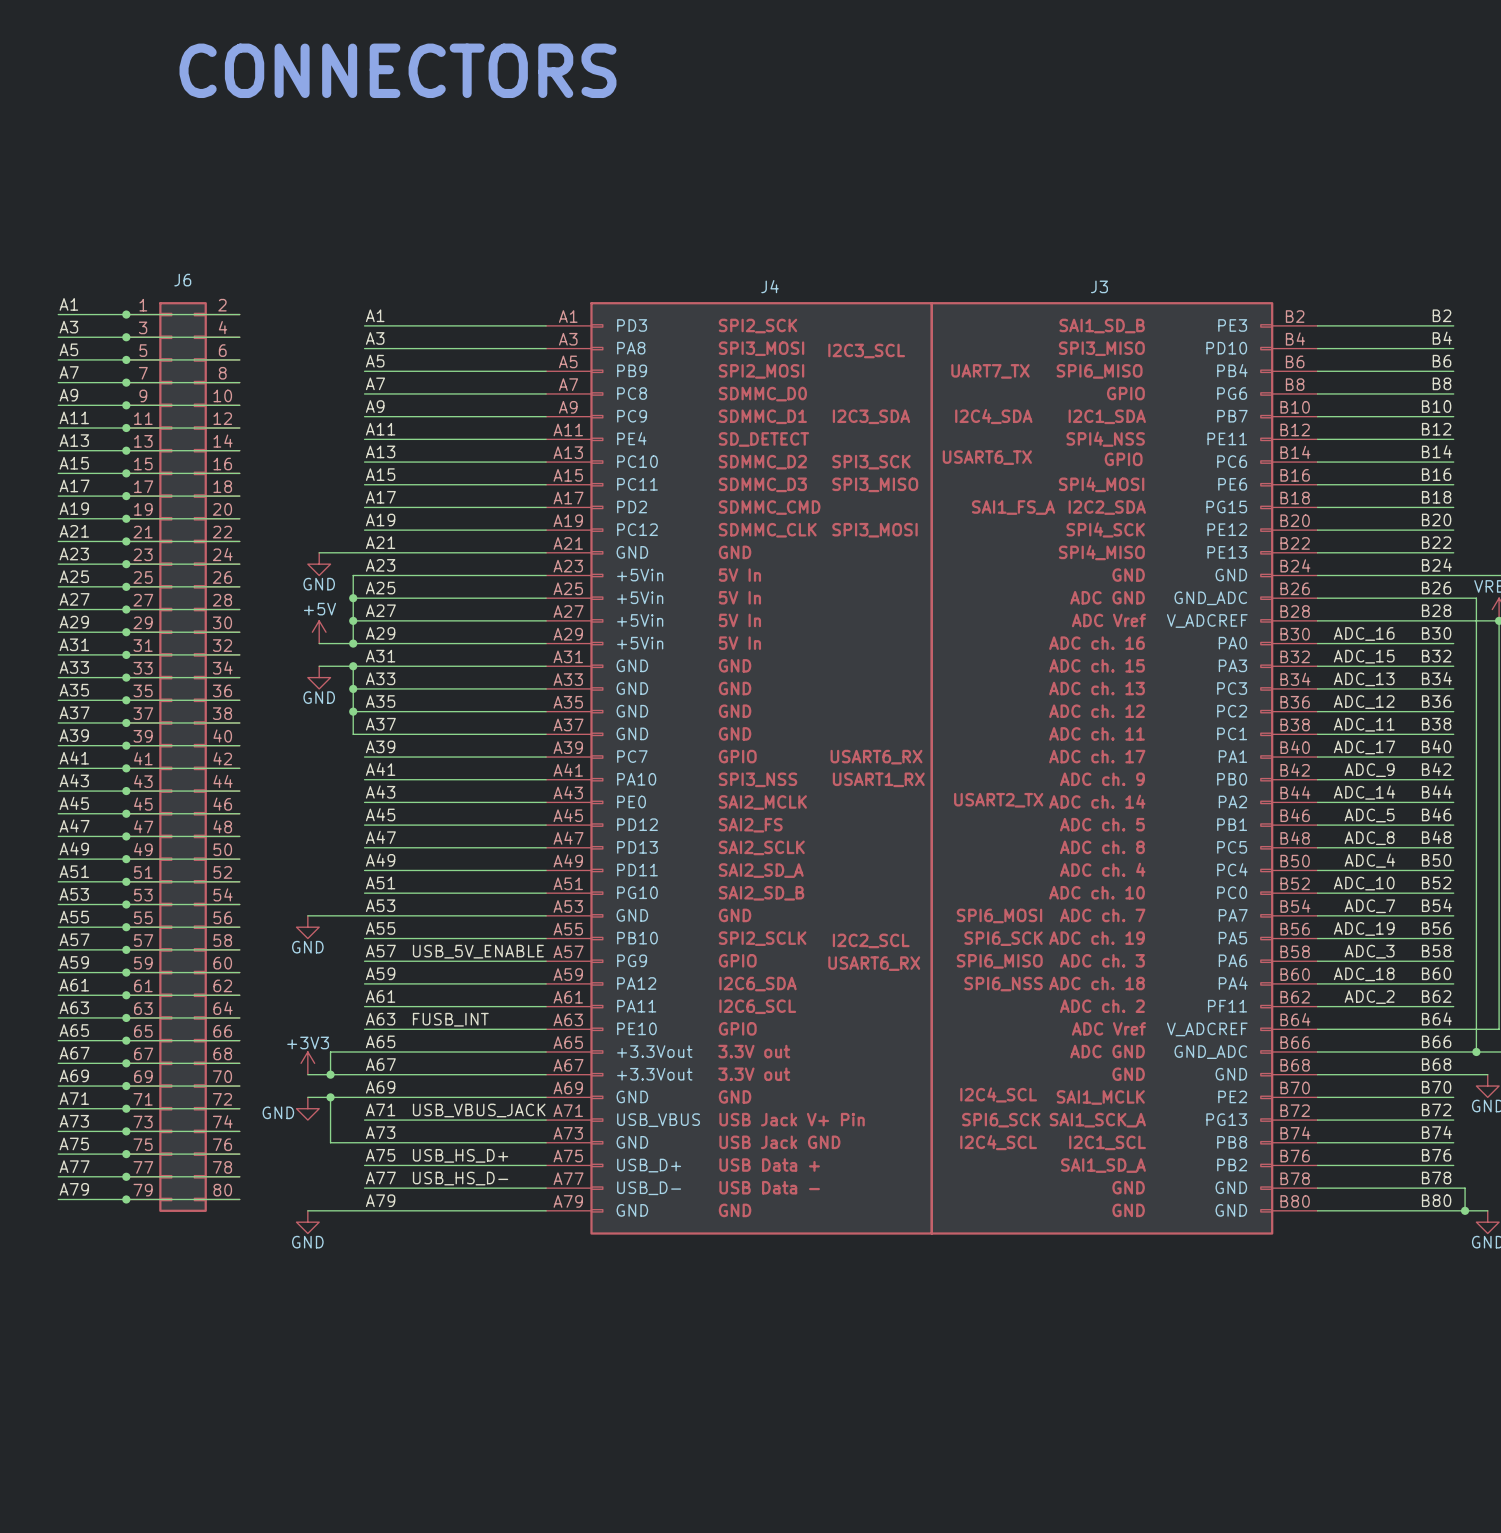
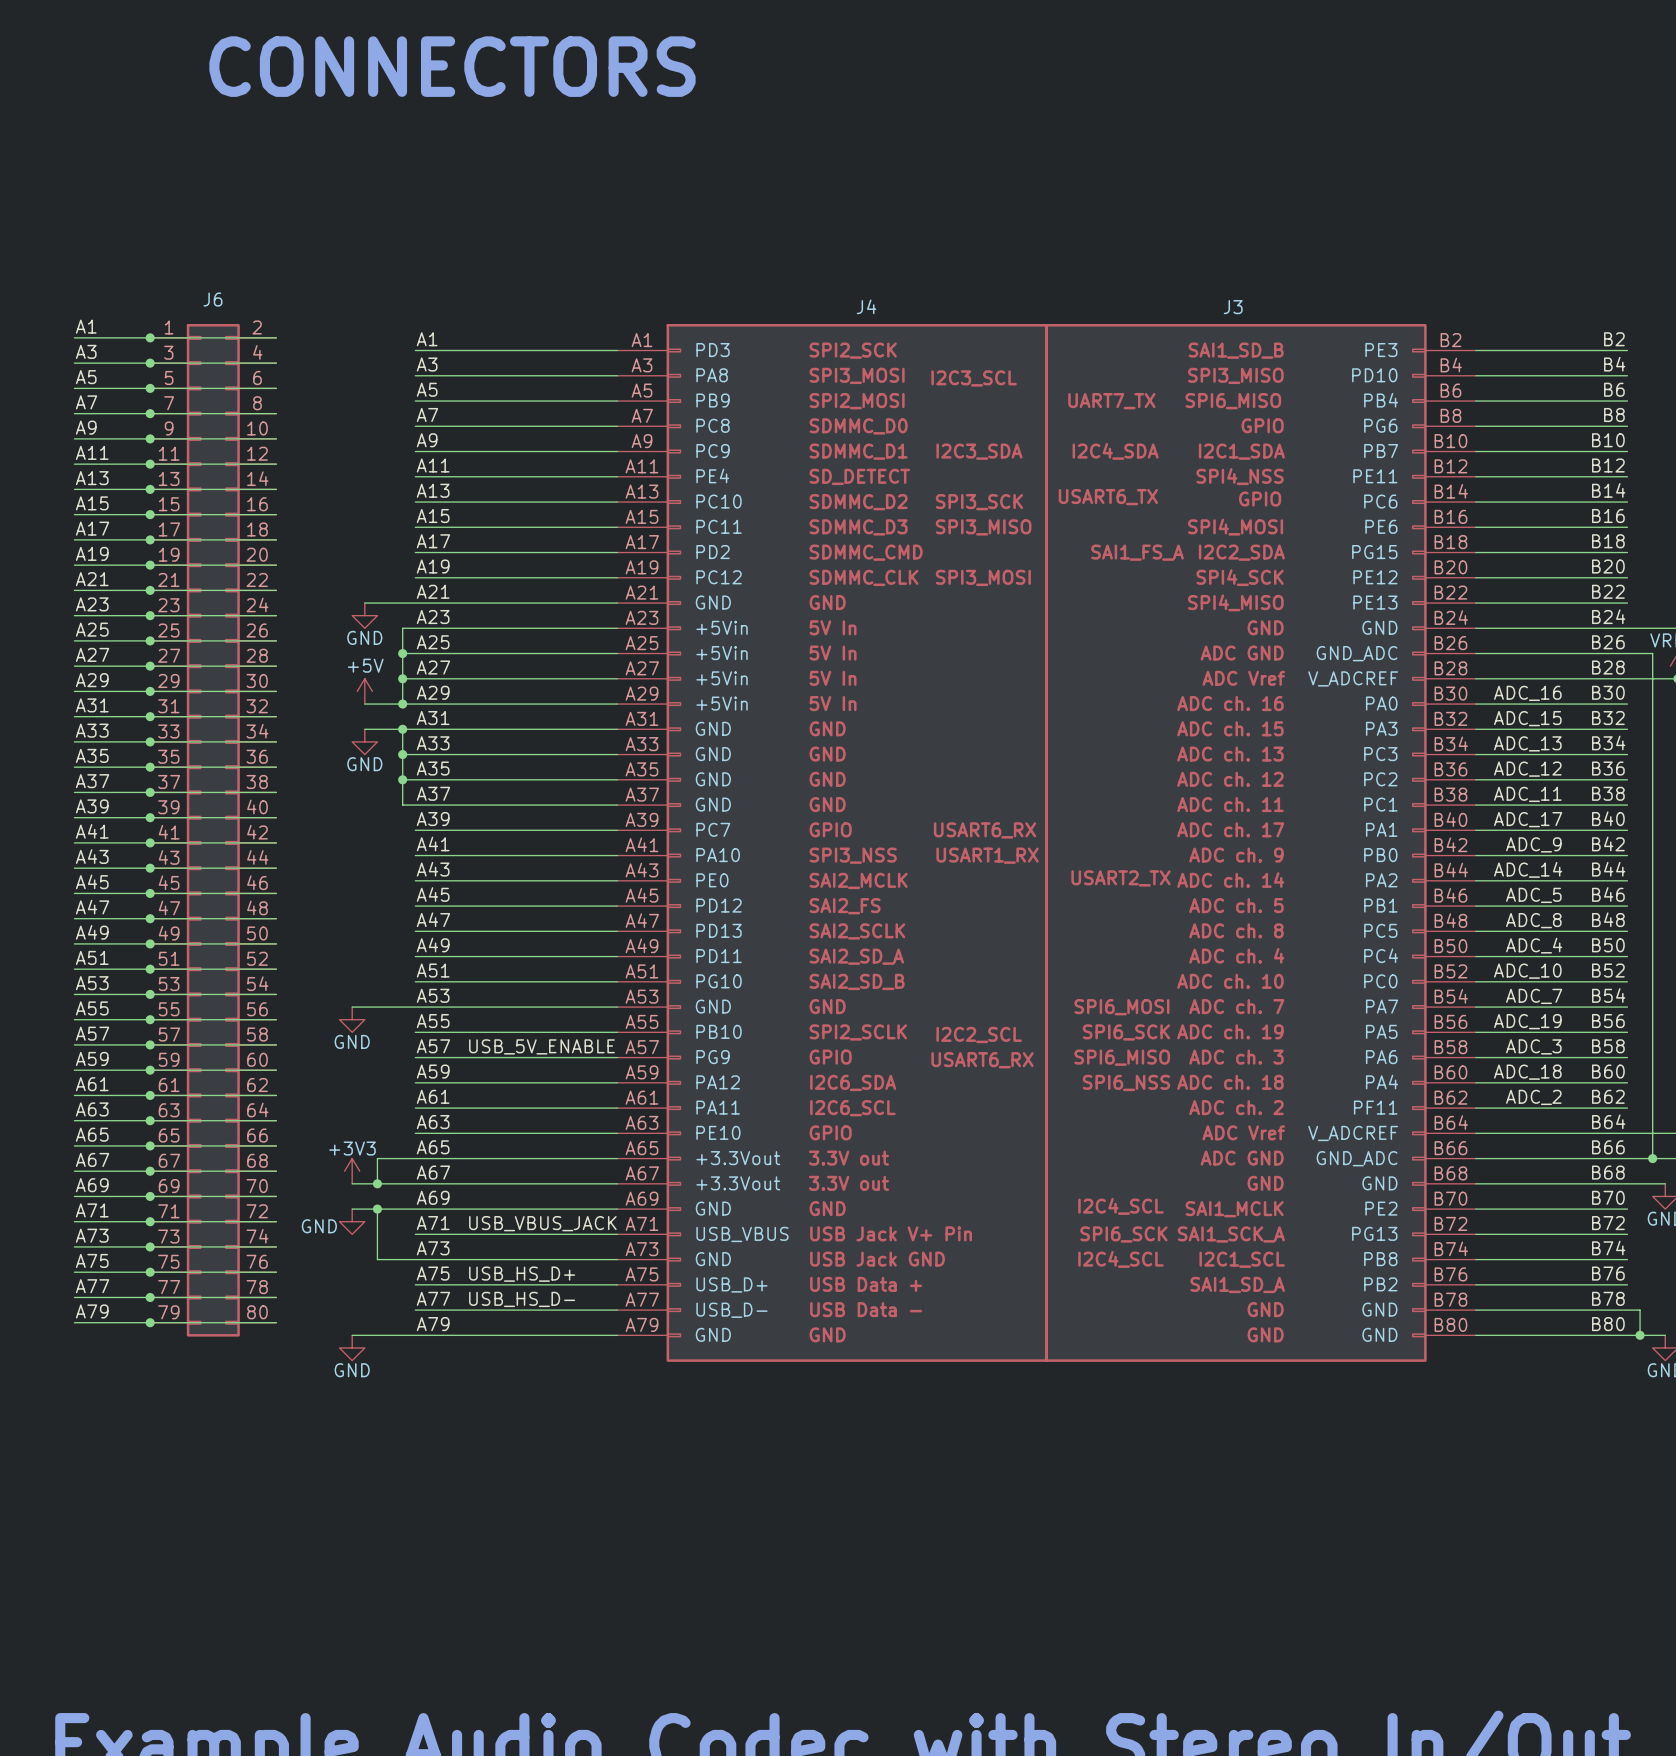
label: FUSB_INT (450, 1019) -> none

